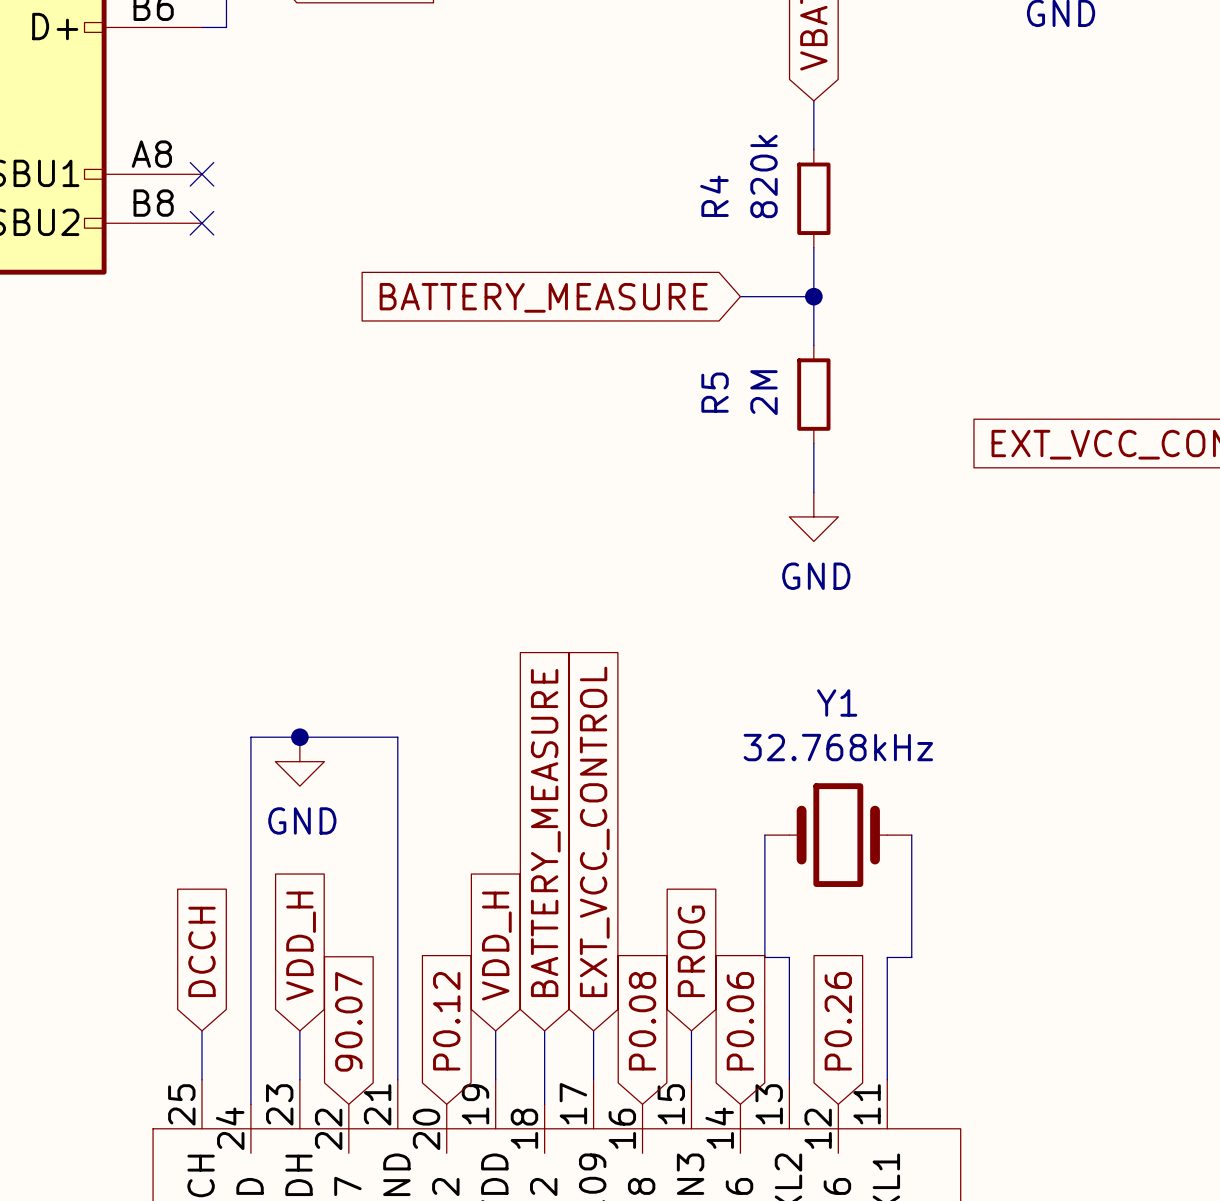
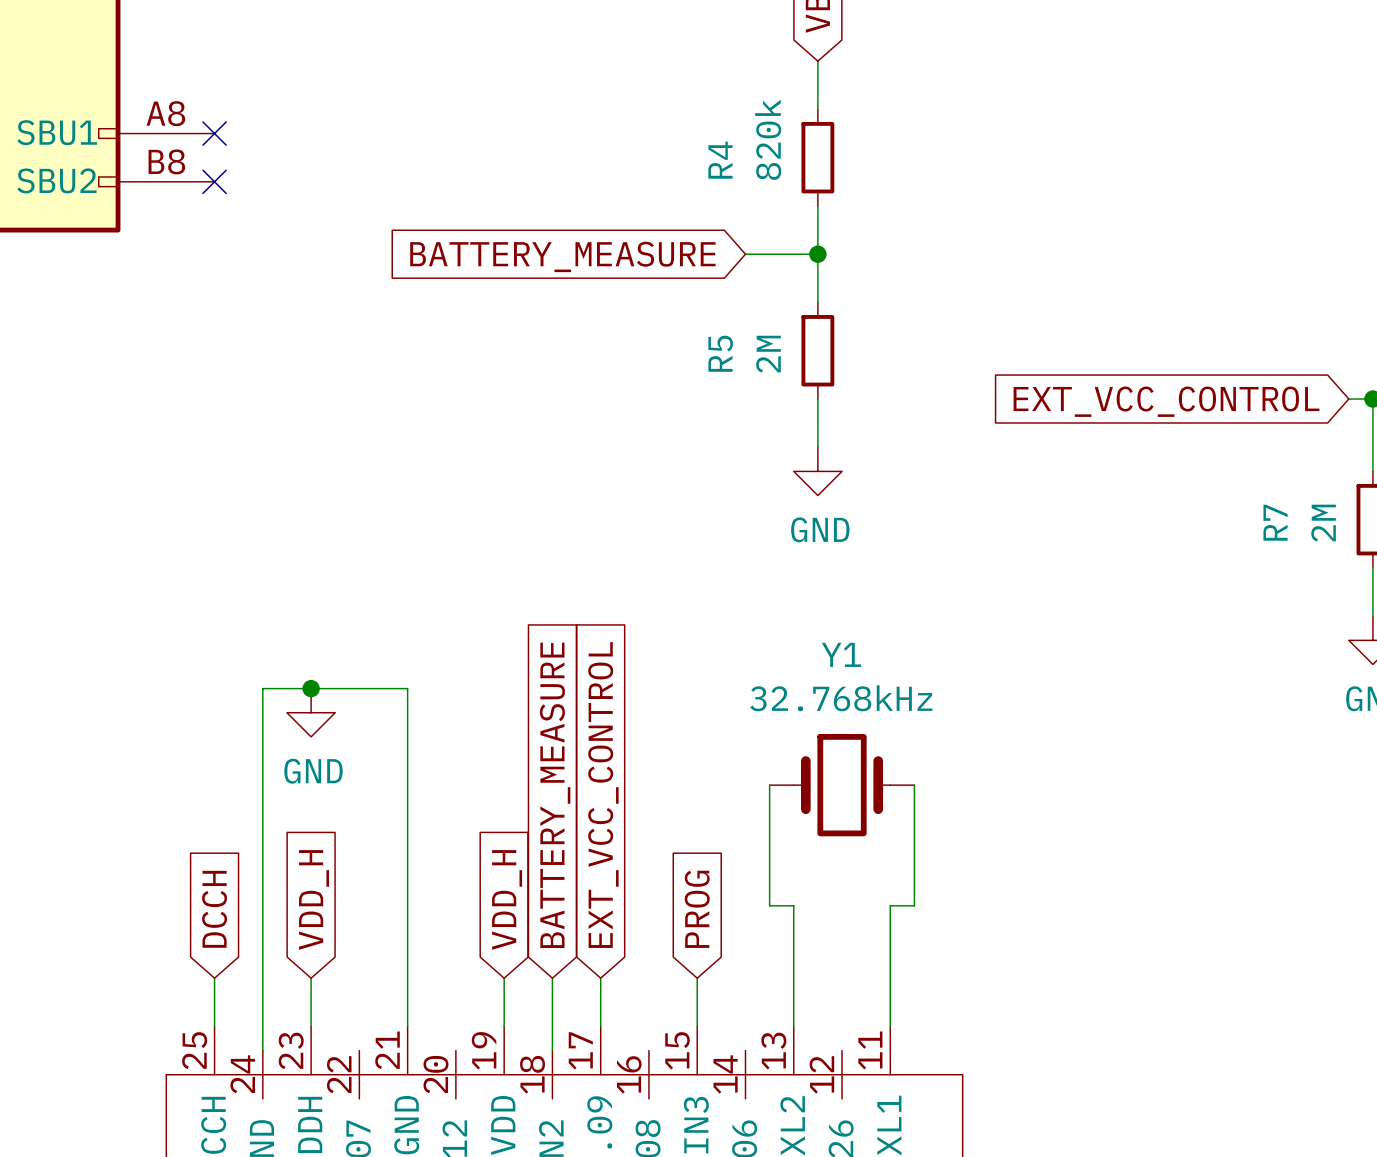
global label: 90.07 (348, 1021) -> none
global label: P0.12 (446, 1021) -> none
global label: P0.08 (642, 1021) -> none
global label: P0.06 (740, 1021) -> none
global label: P0.26 (838, 1021) -> none

